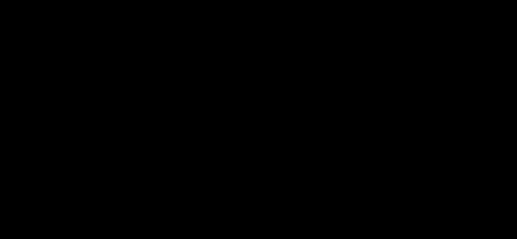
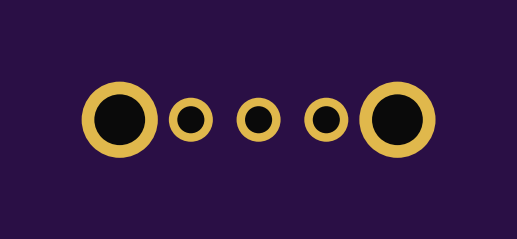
part: none -> (258, 119)

